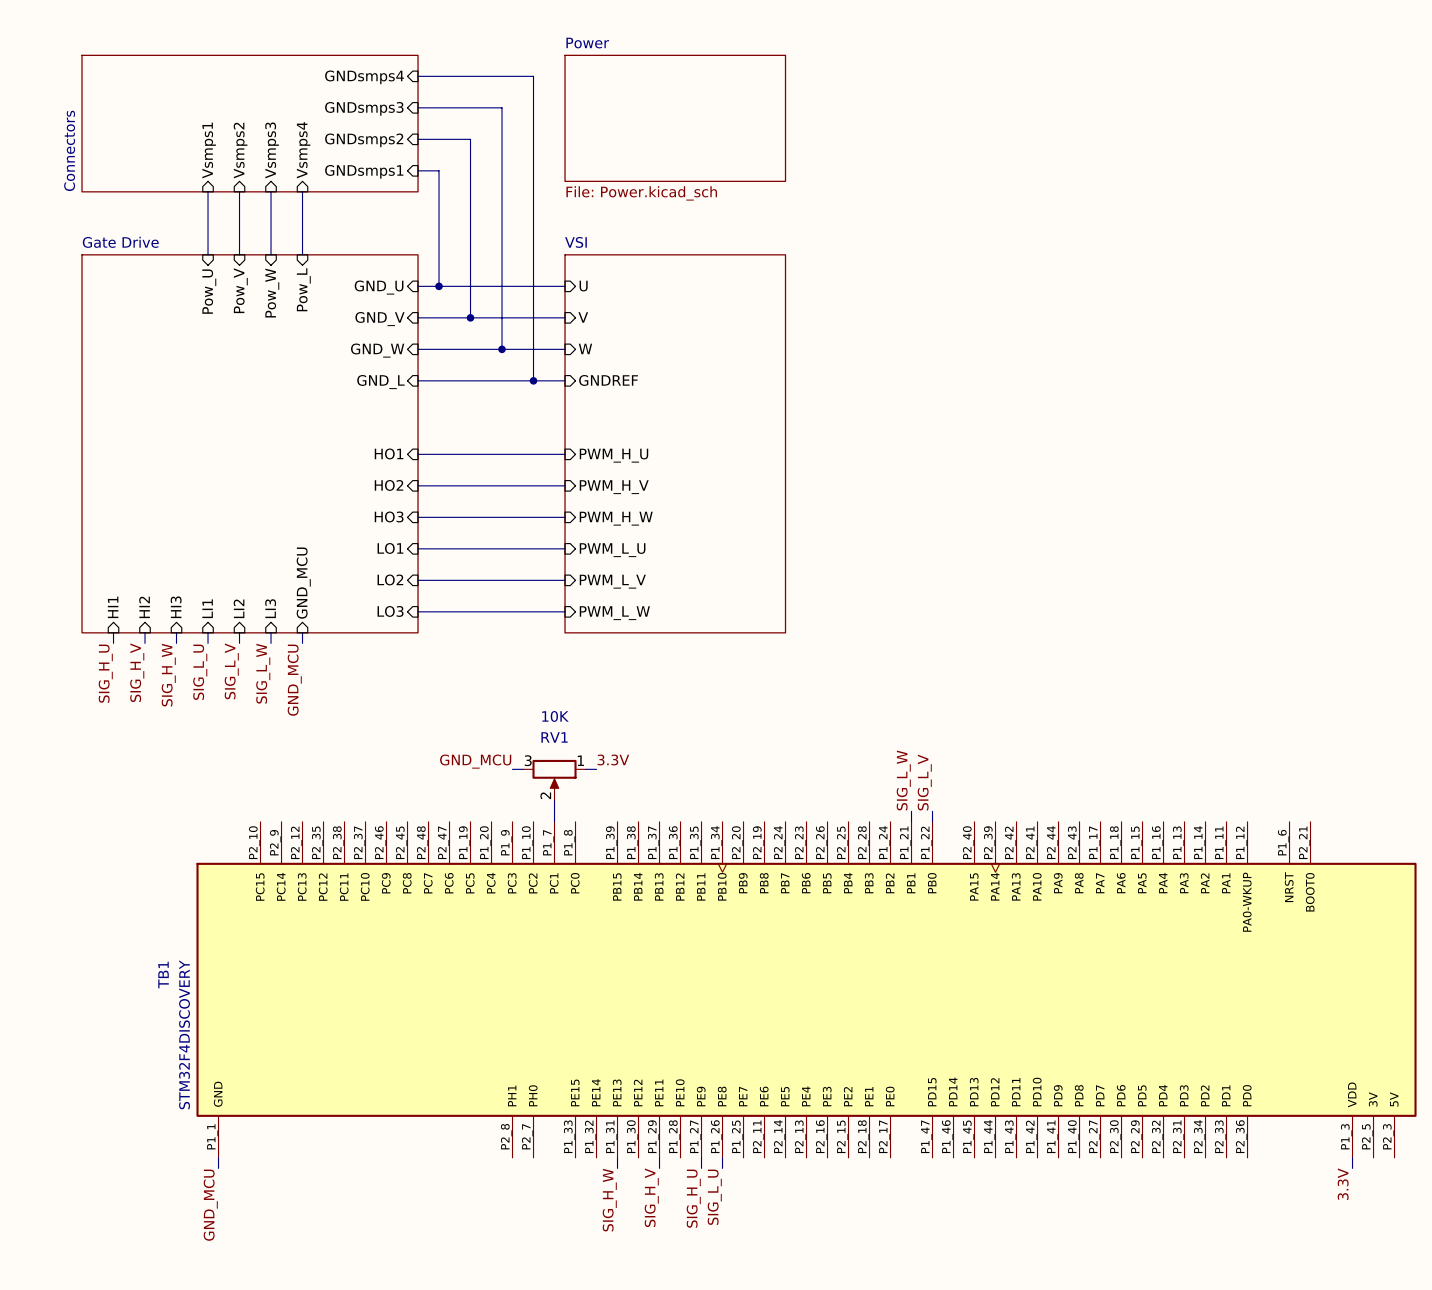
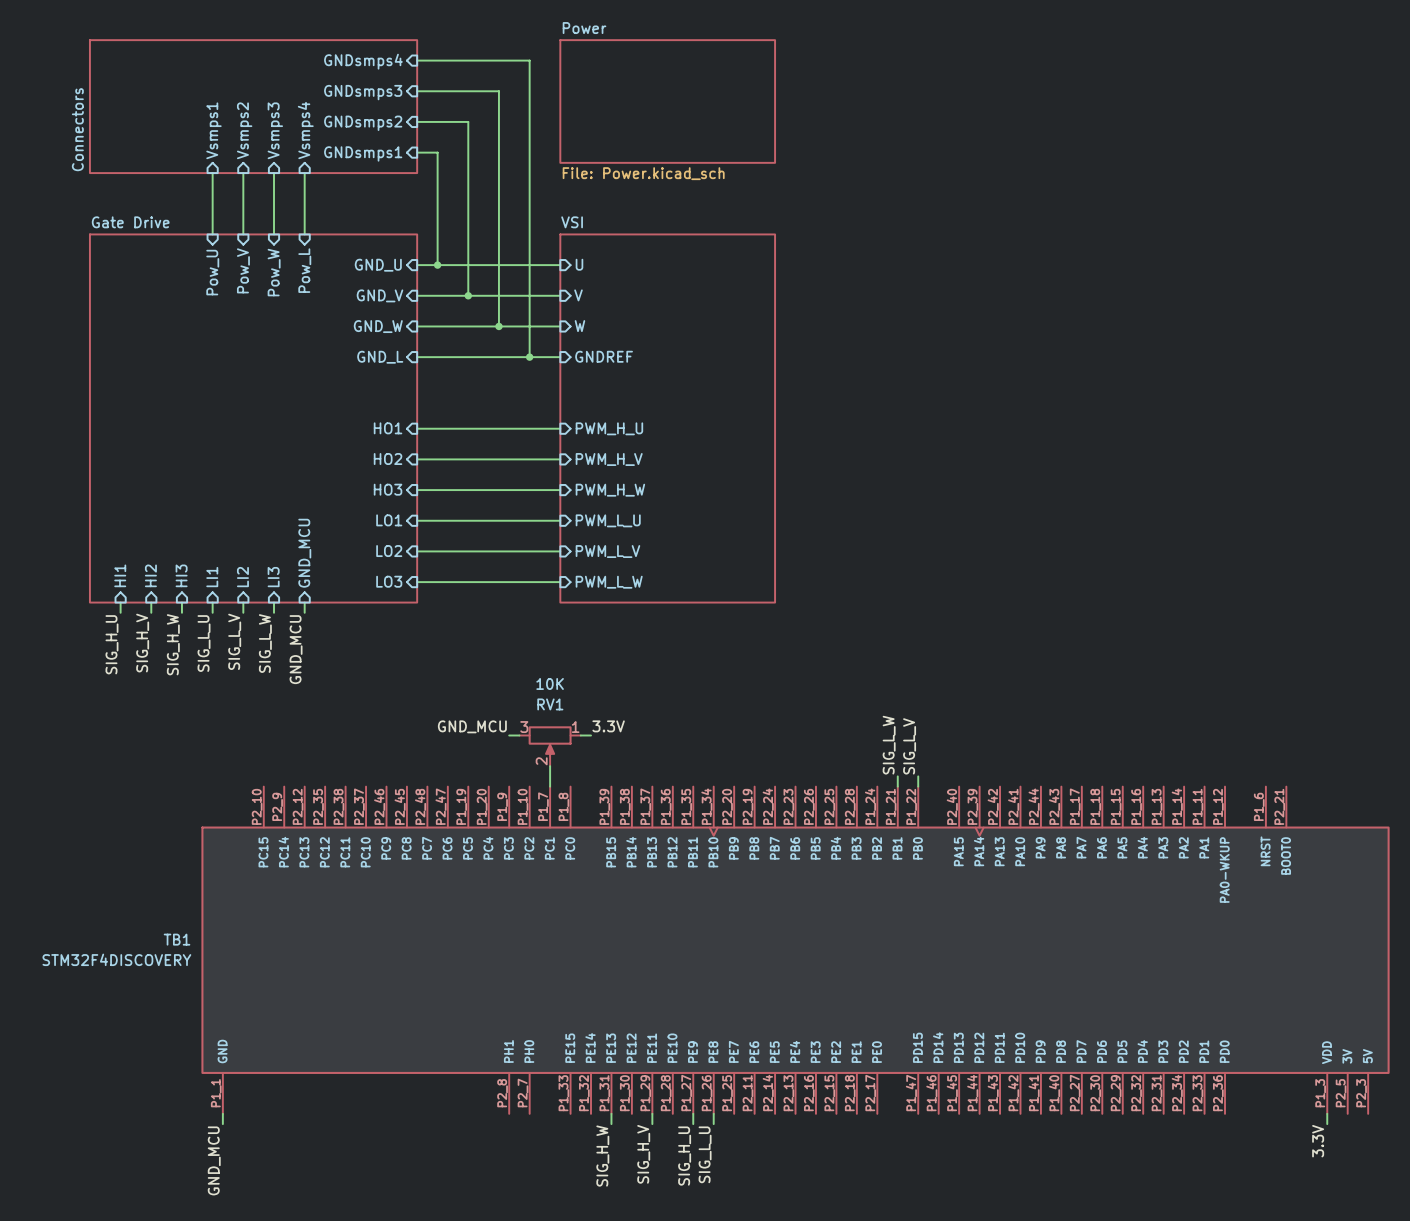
TB1 name rotation: 0° (163, 975) -> 90° clockwise (177, 939)
TB1 value rotation: 0° (184, 1034) -> 90° clockwise (116, 959)

